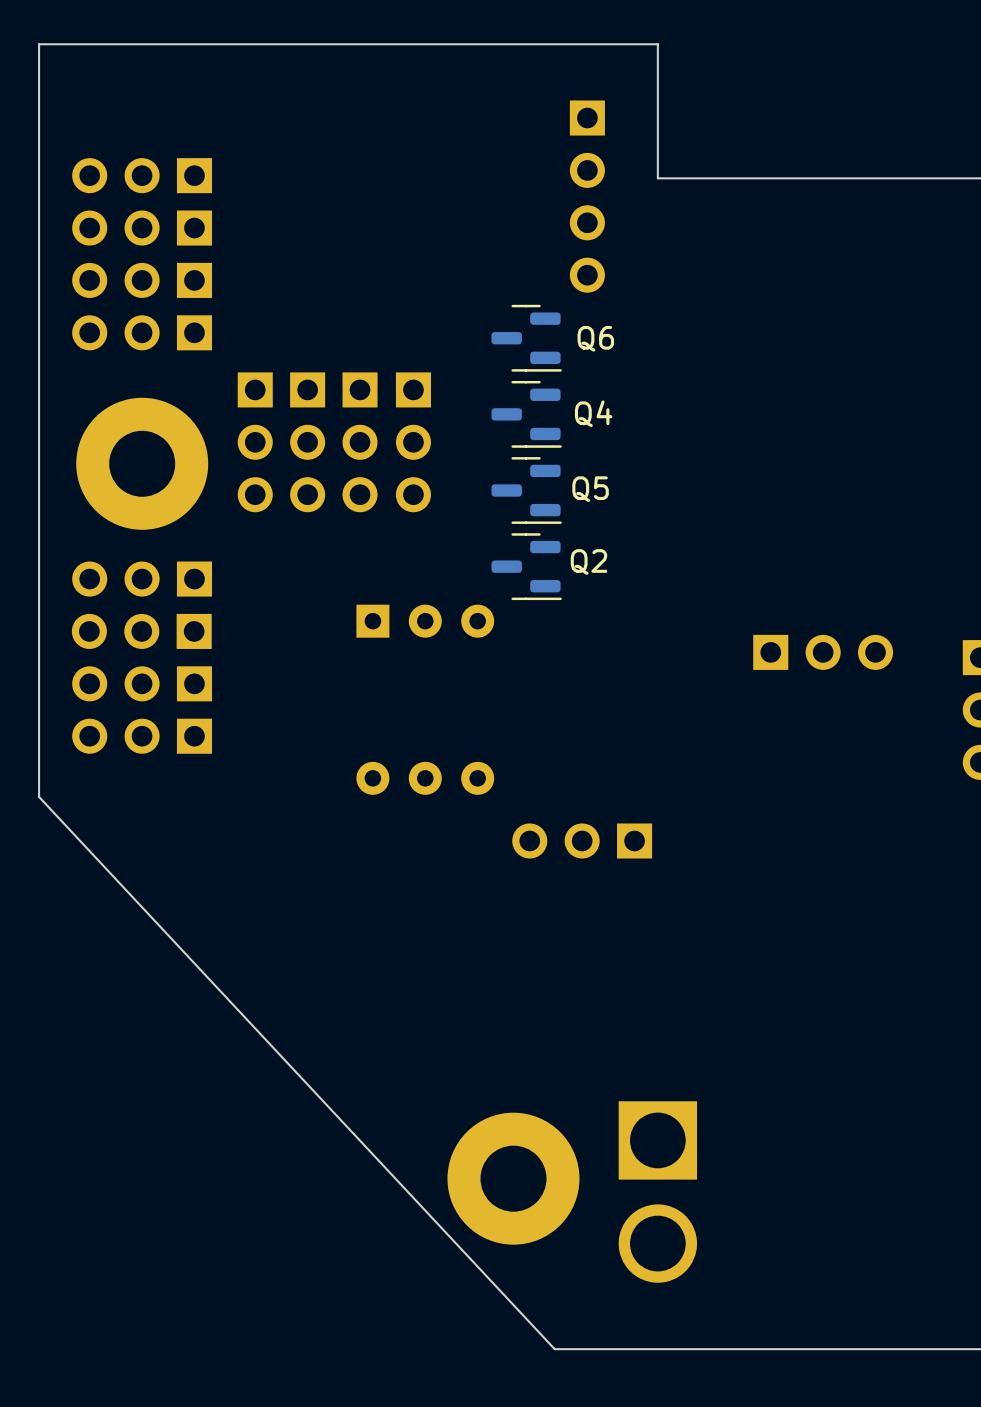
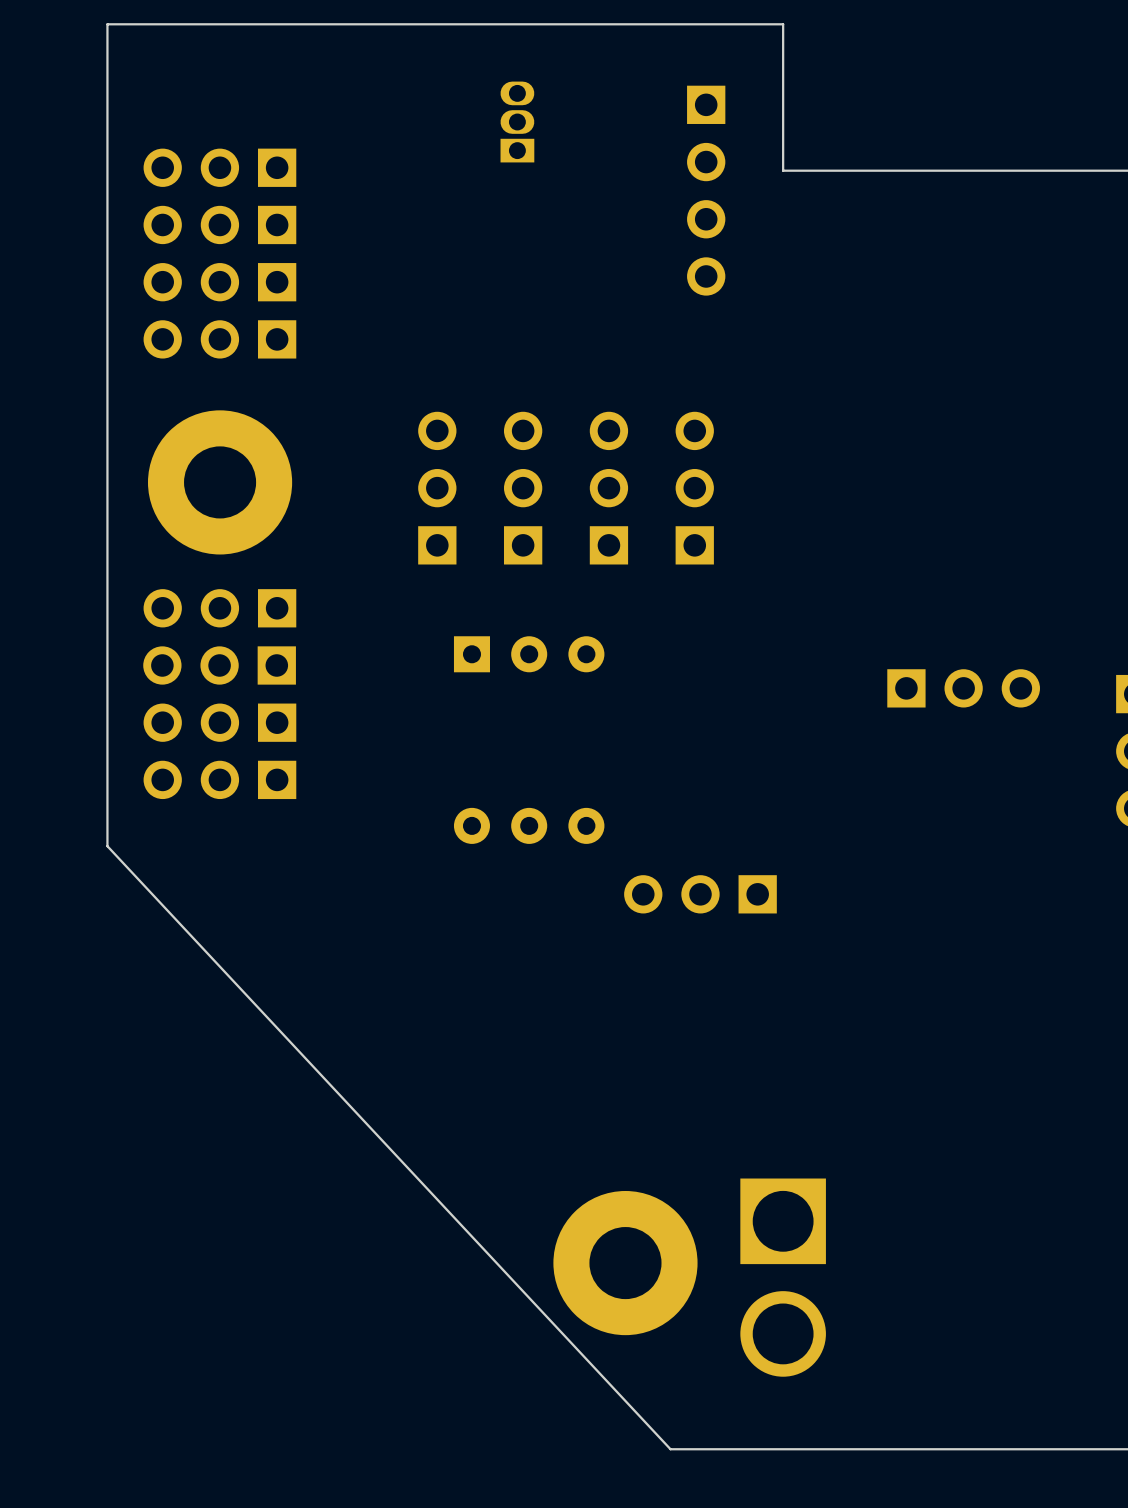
part: none -> (517, 122)
Q6: (526, 338) -> none
Q4: (526, 414) -> none
part: (255, 442) -> none
part: (307, 442) -> none
part: (360, 442) -> none
part rotation: 0° (413, 442) -> 180° (523, 488)
part: none -> (437, 488)
part: none -> (608, 488)
part: none -> (694, 488)
Q5: (526, 490) -> none
Q2: (526, 566) -> none

